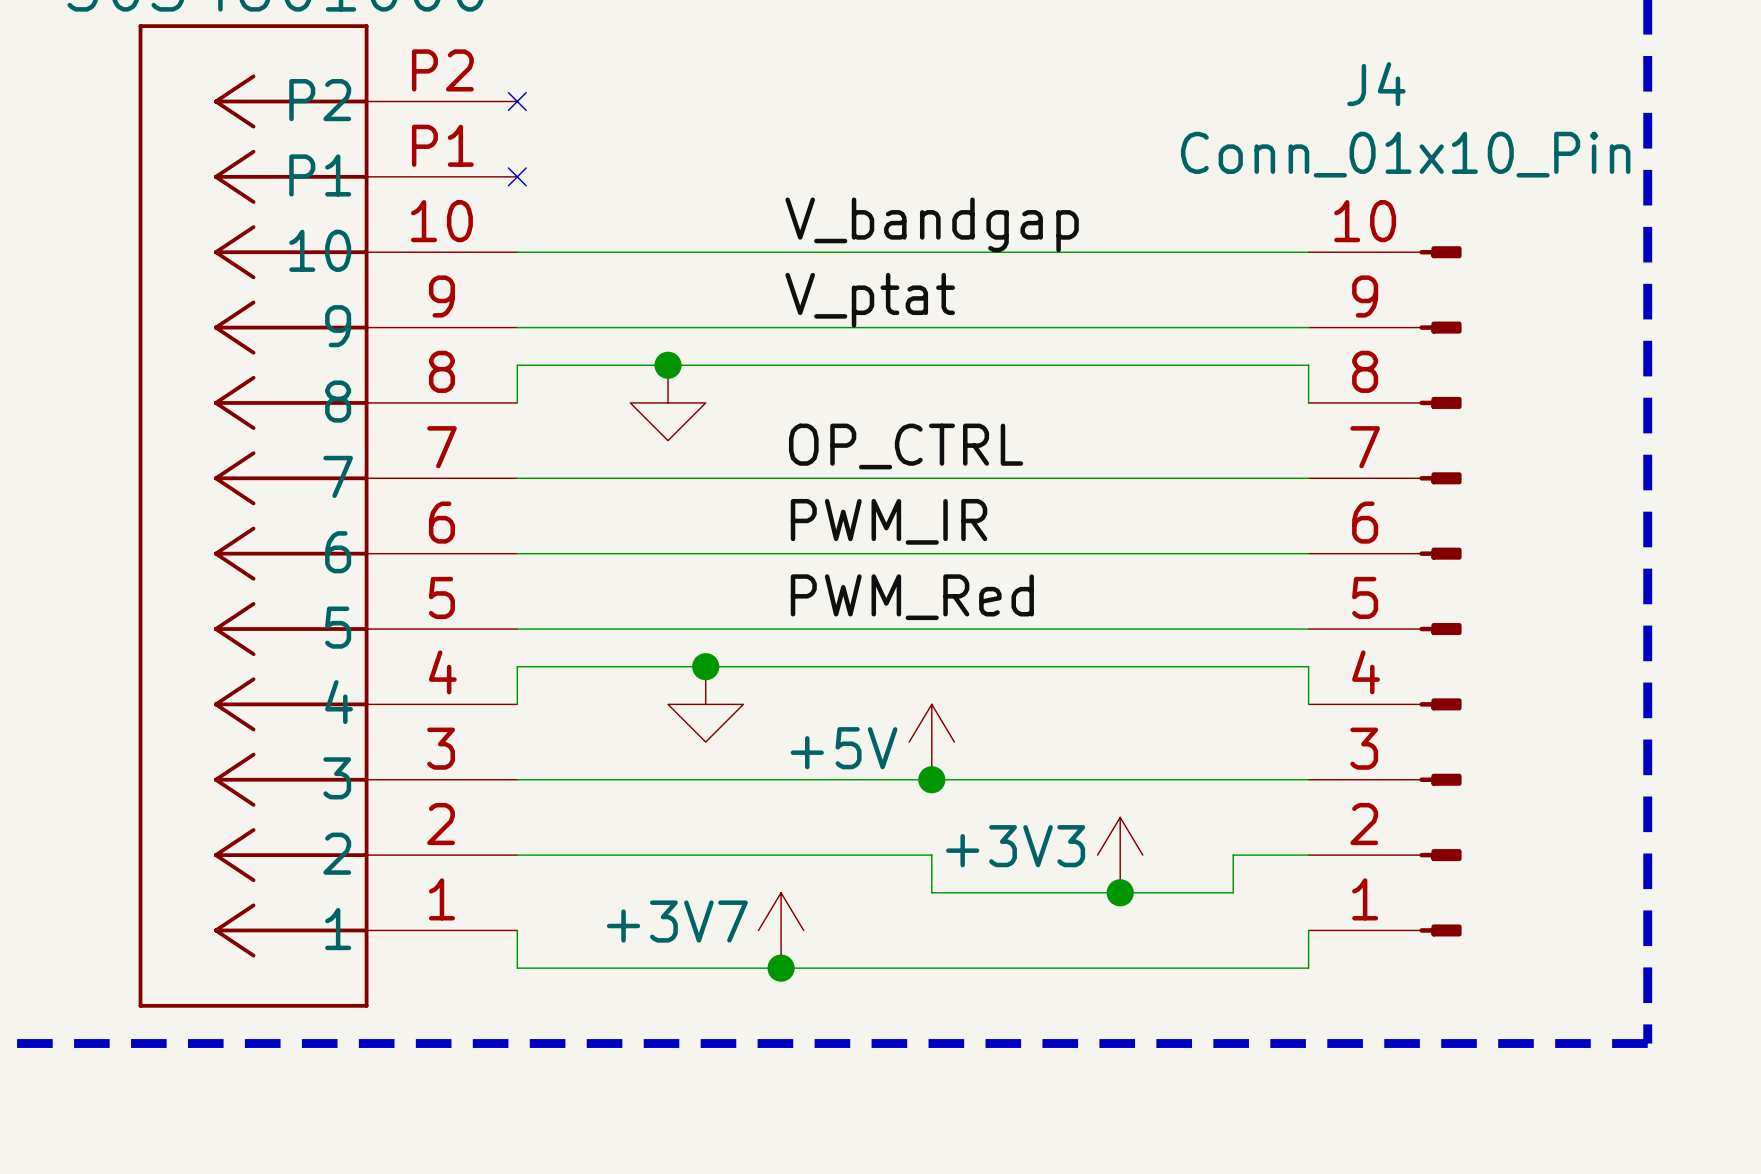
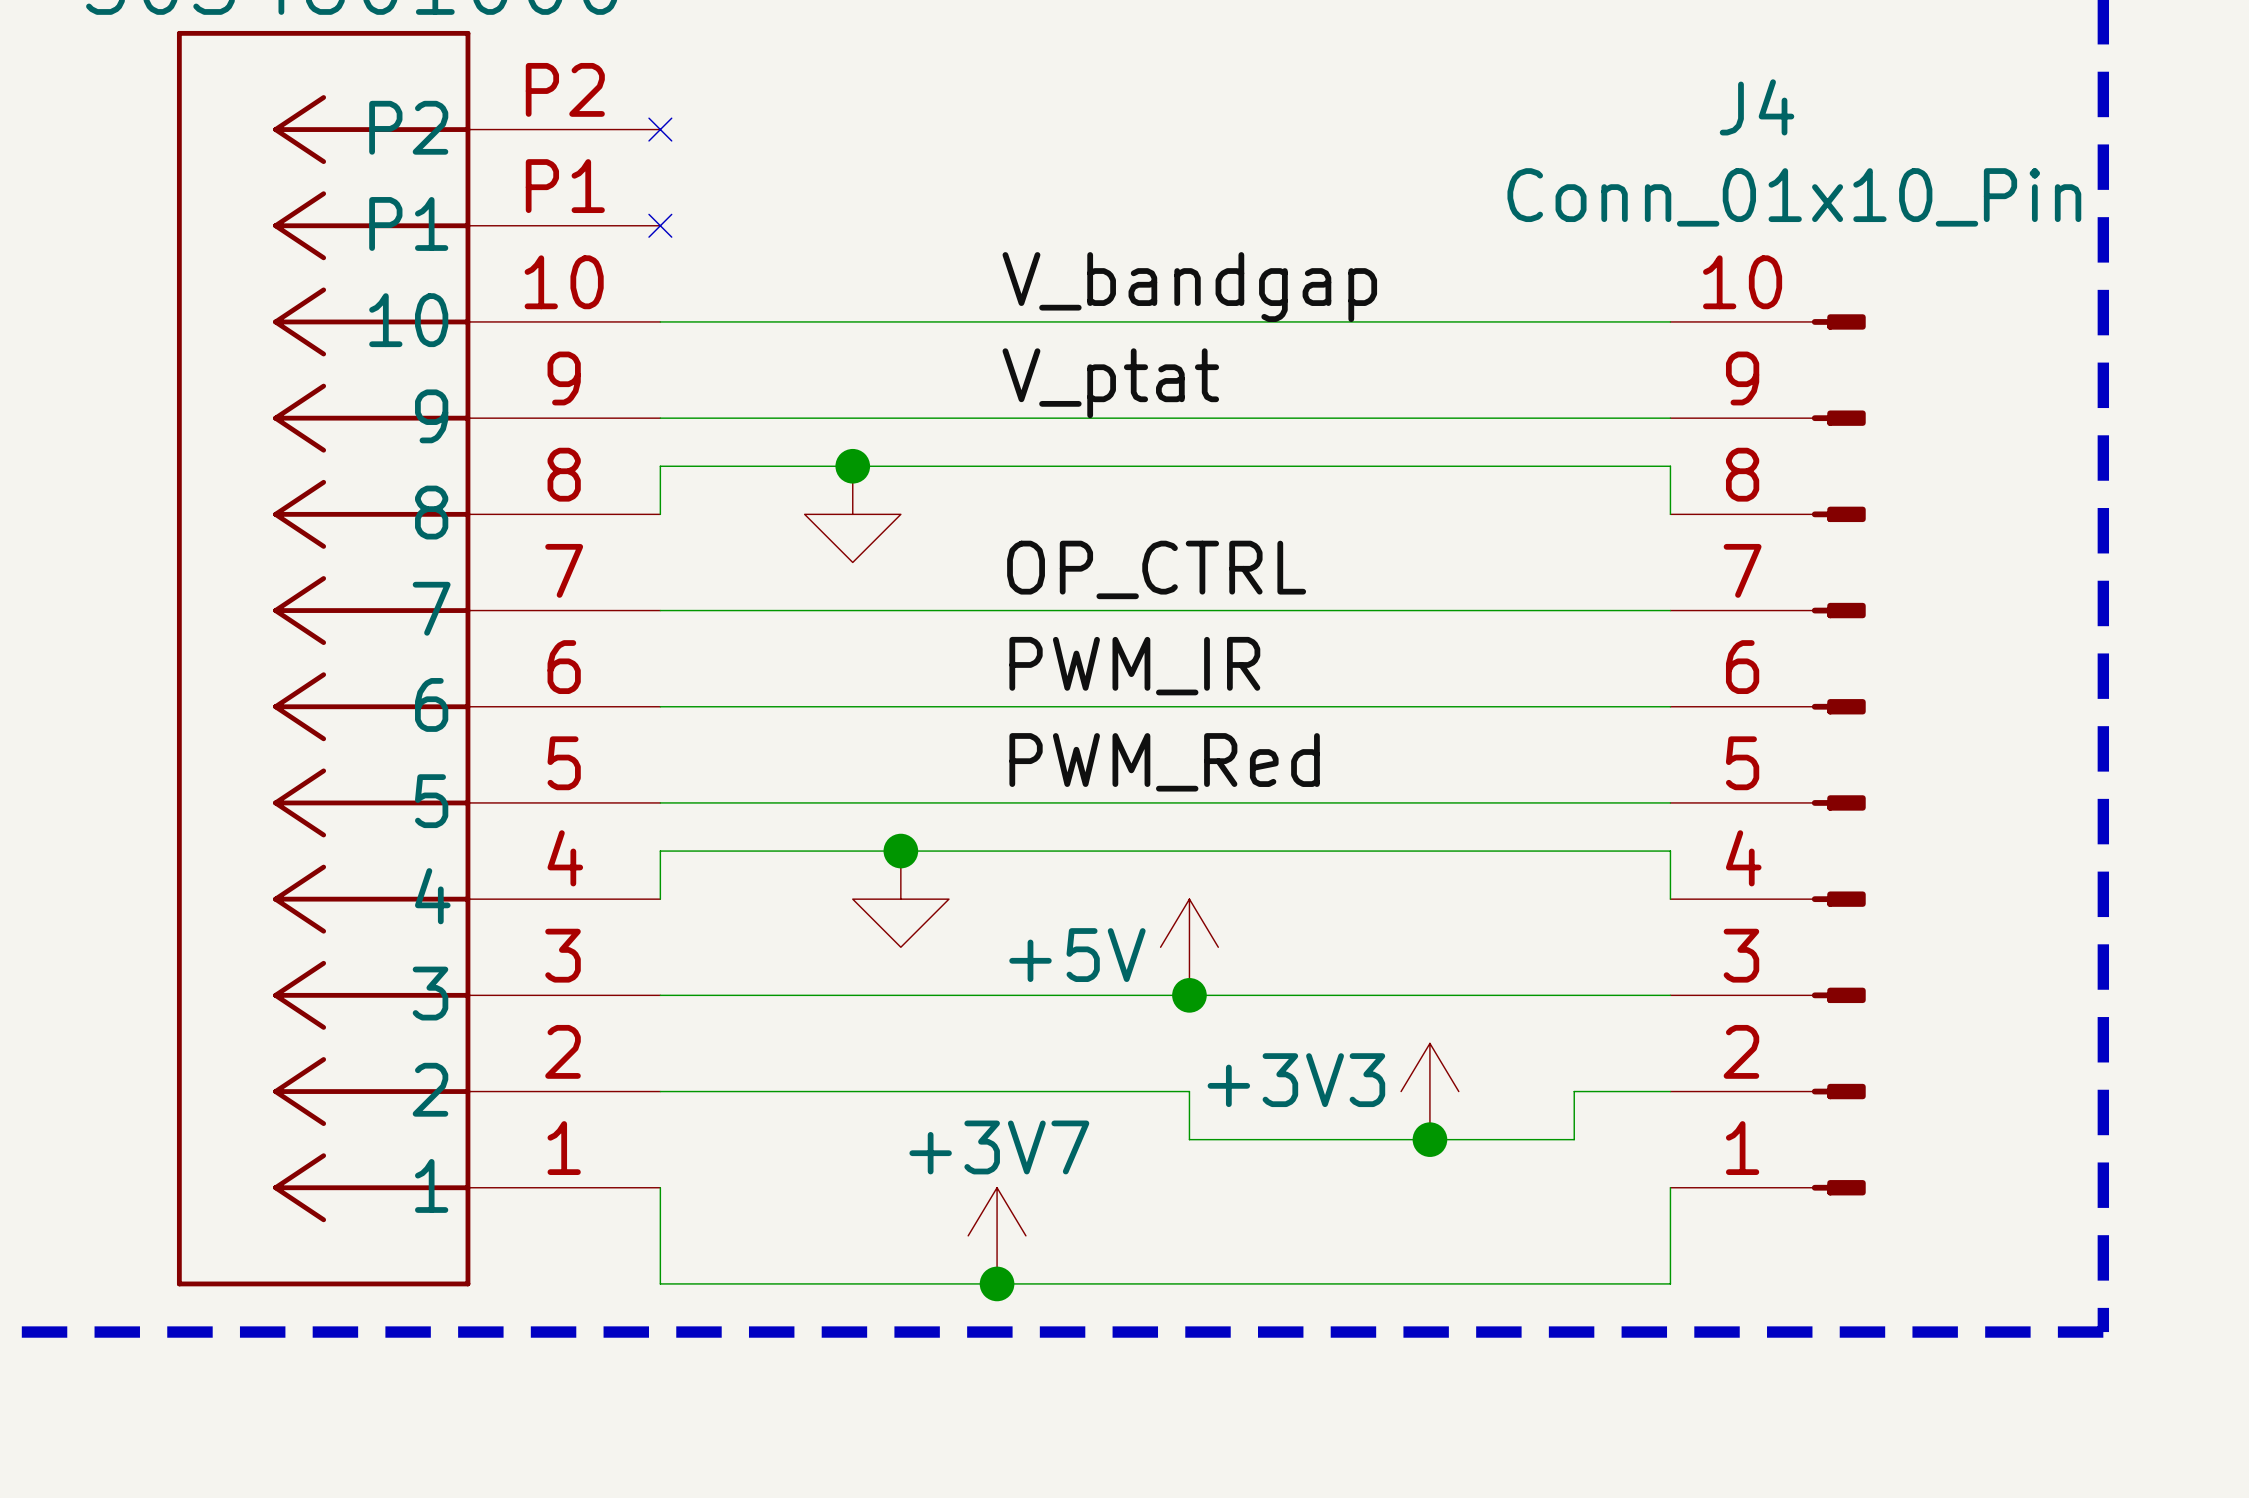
power symbol text position: +3V7 (677, 921) -> +3V7 (999, 1147)
power symbol position: +3V7 (781, 930) -> +3V7 (997, 1235)
wire: (517, 968) (1308, 968) -> (660, 1235) (660, 1283) (1670, 1283) (1670, 1235)
junction position: (781, 968) -> (997, 1283)

